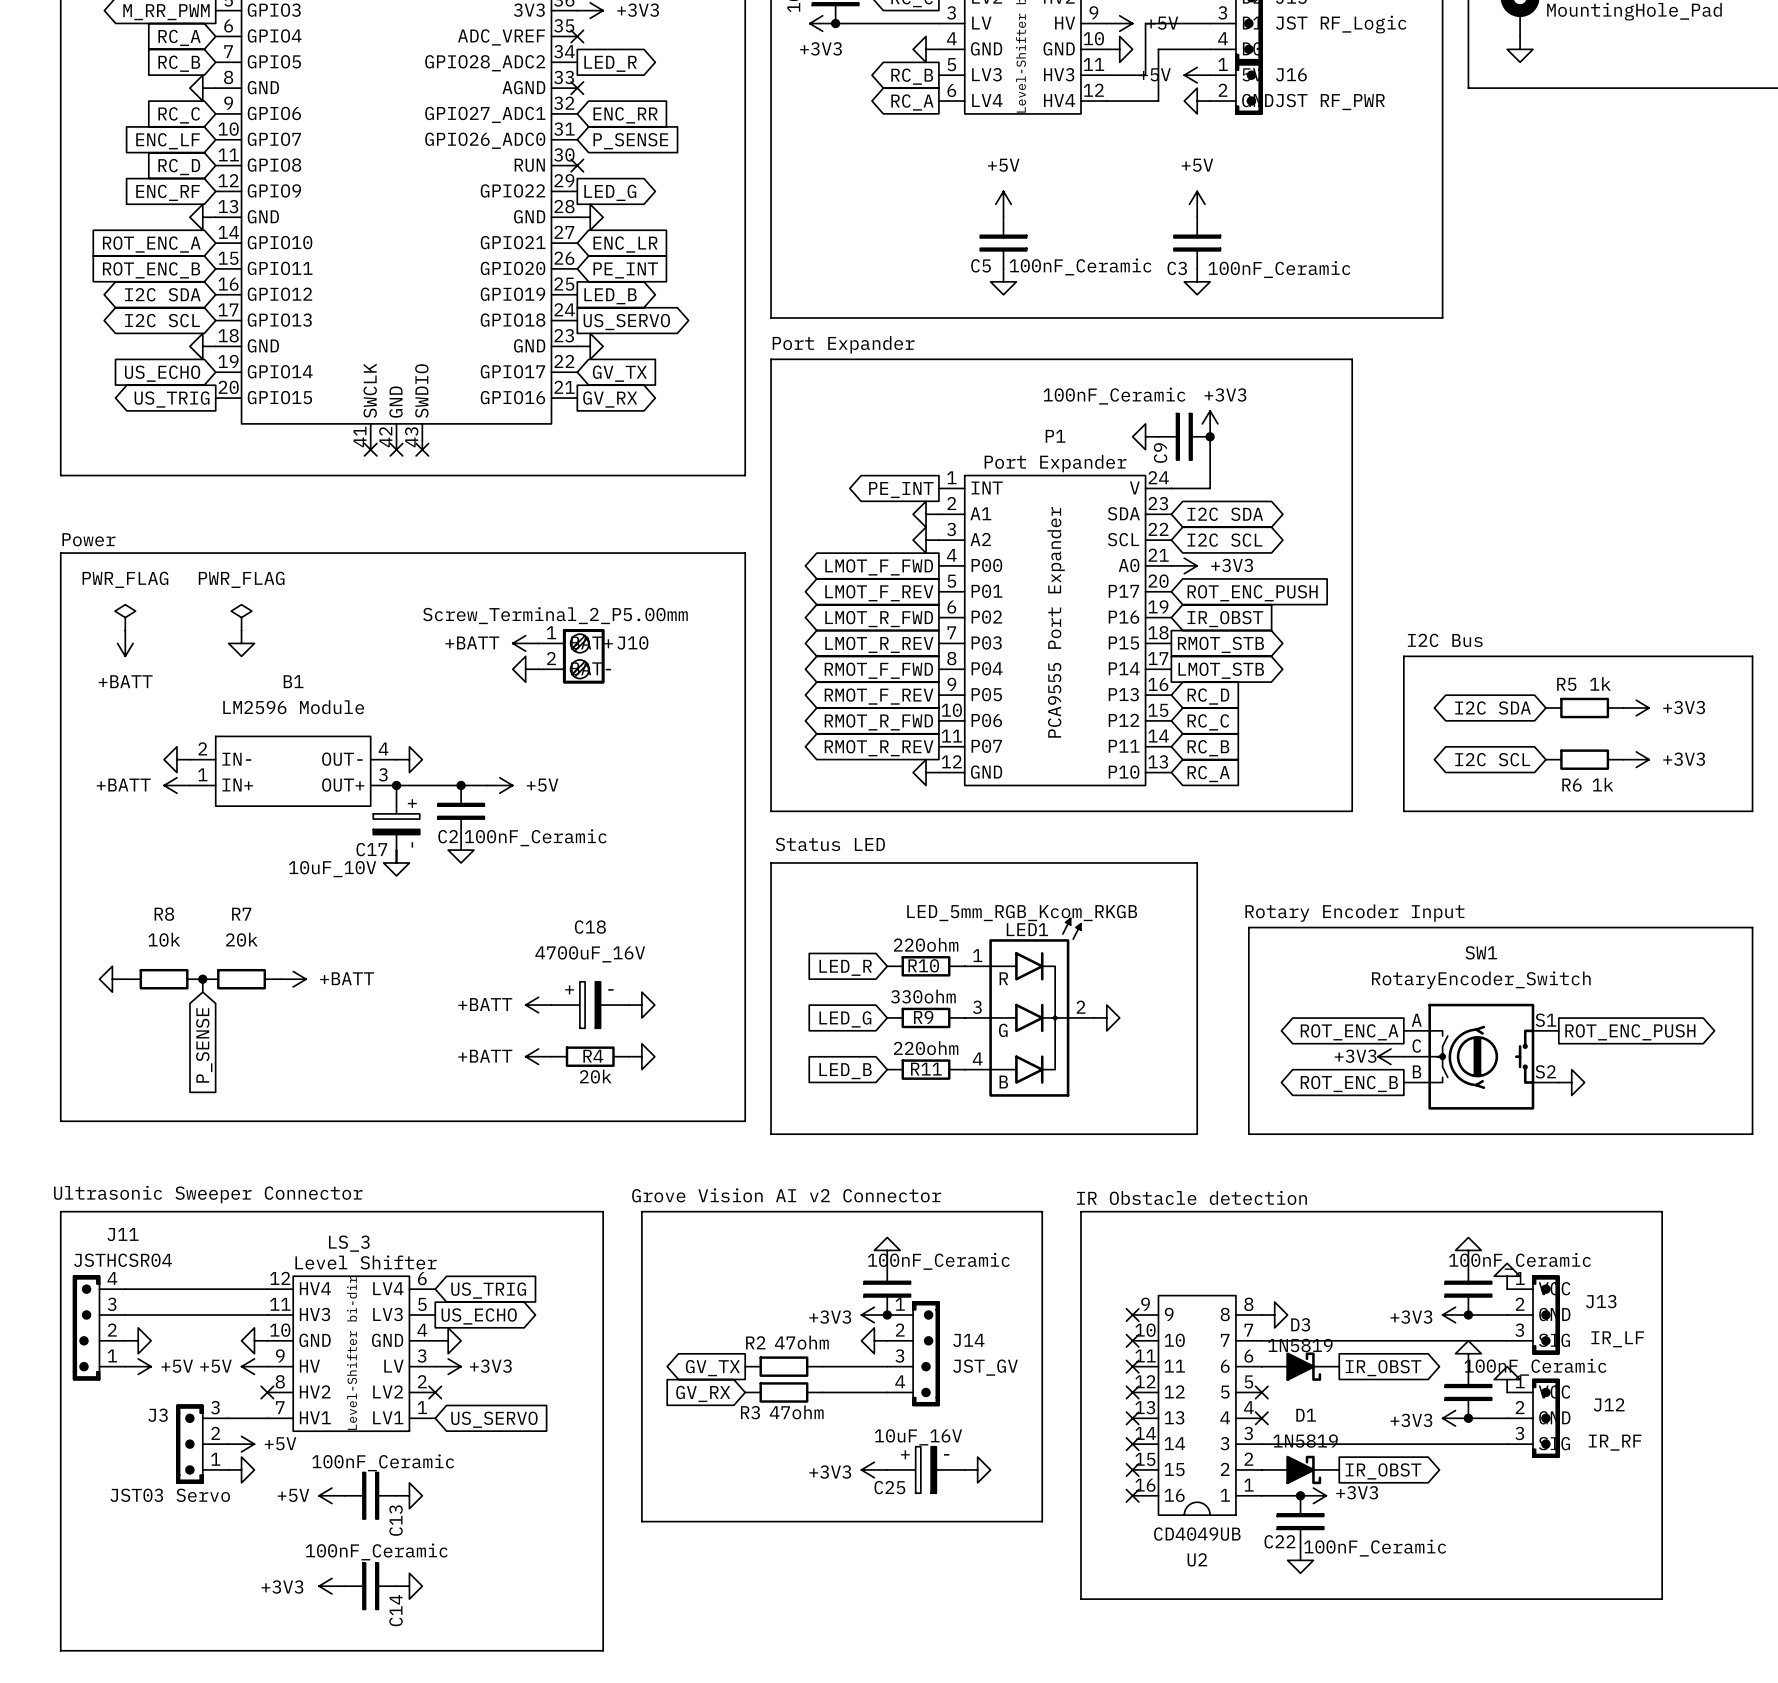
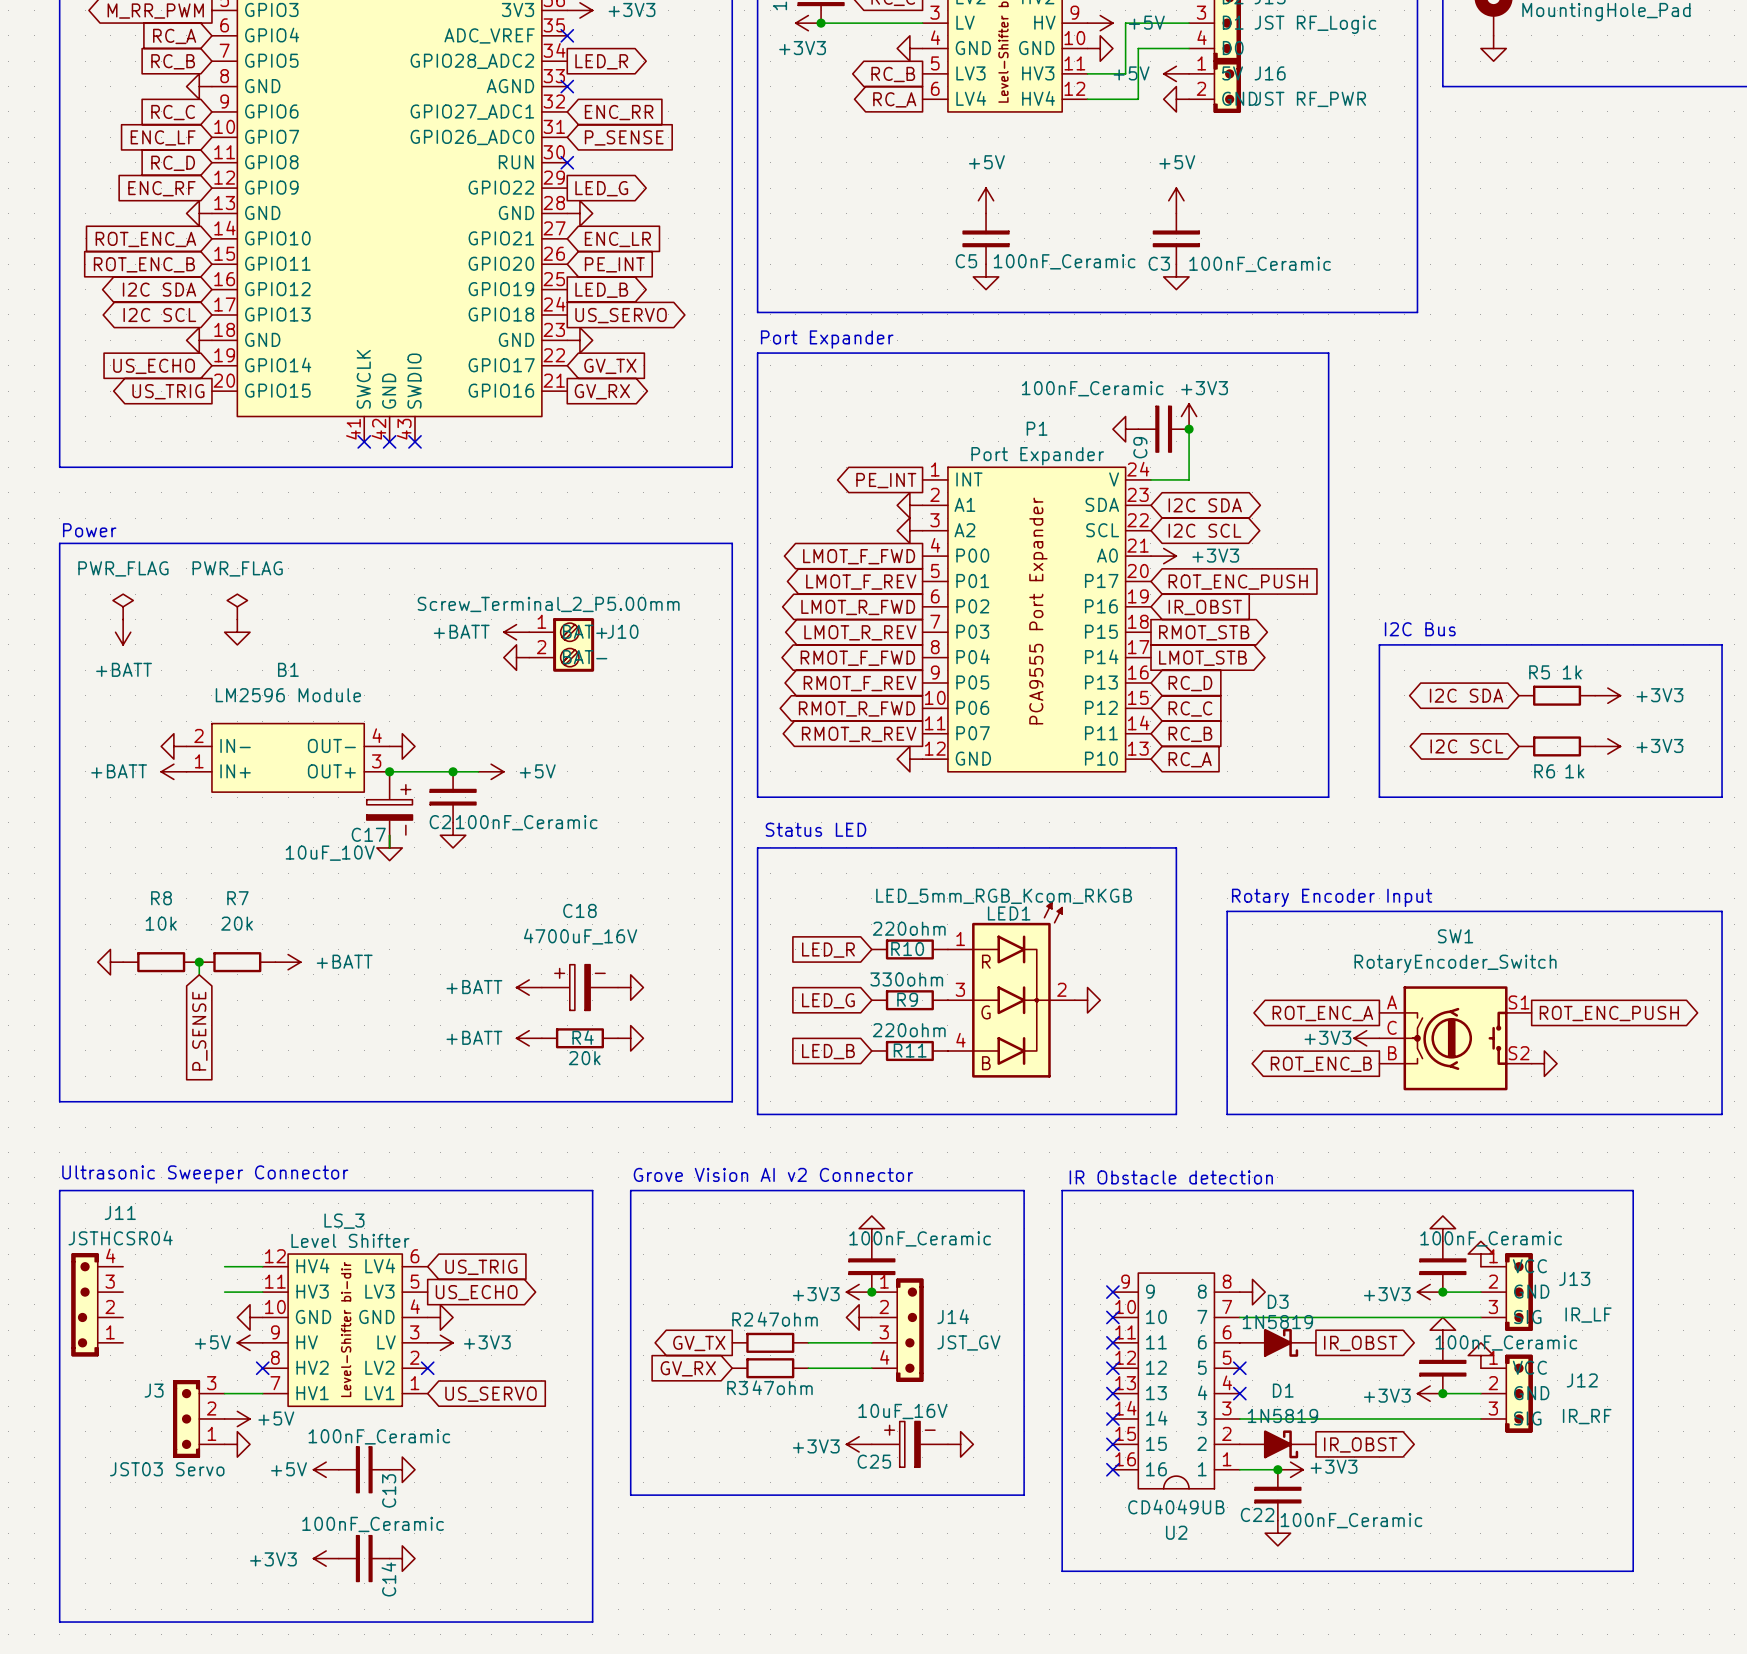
wire: (125, 1289) (228, 1289) -> none
wire: (125, 1314) (228, 1314) -> none
power symbol: (138, 1340) -> none
power symbol: +5V (138, 1366) -> none

